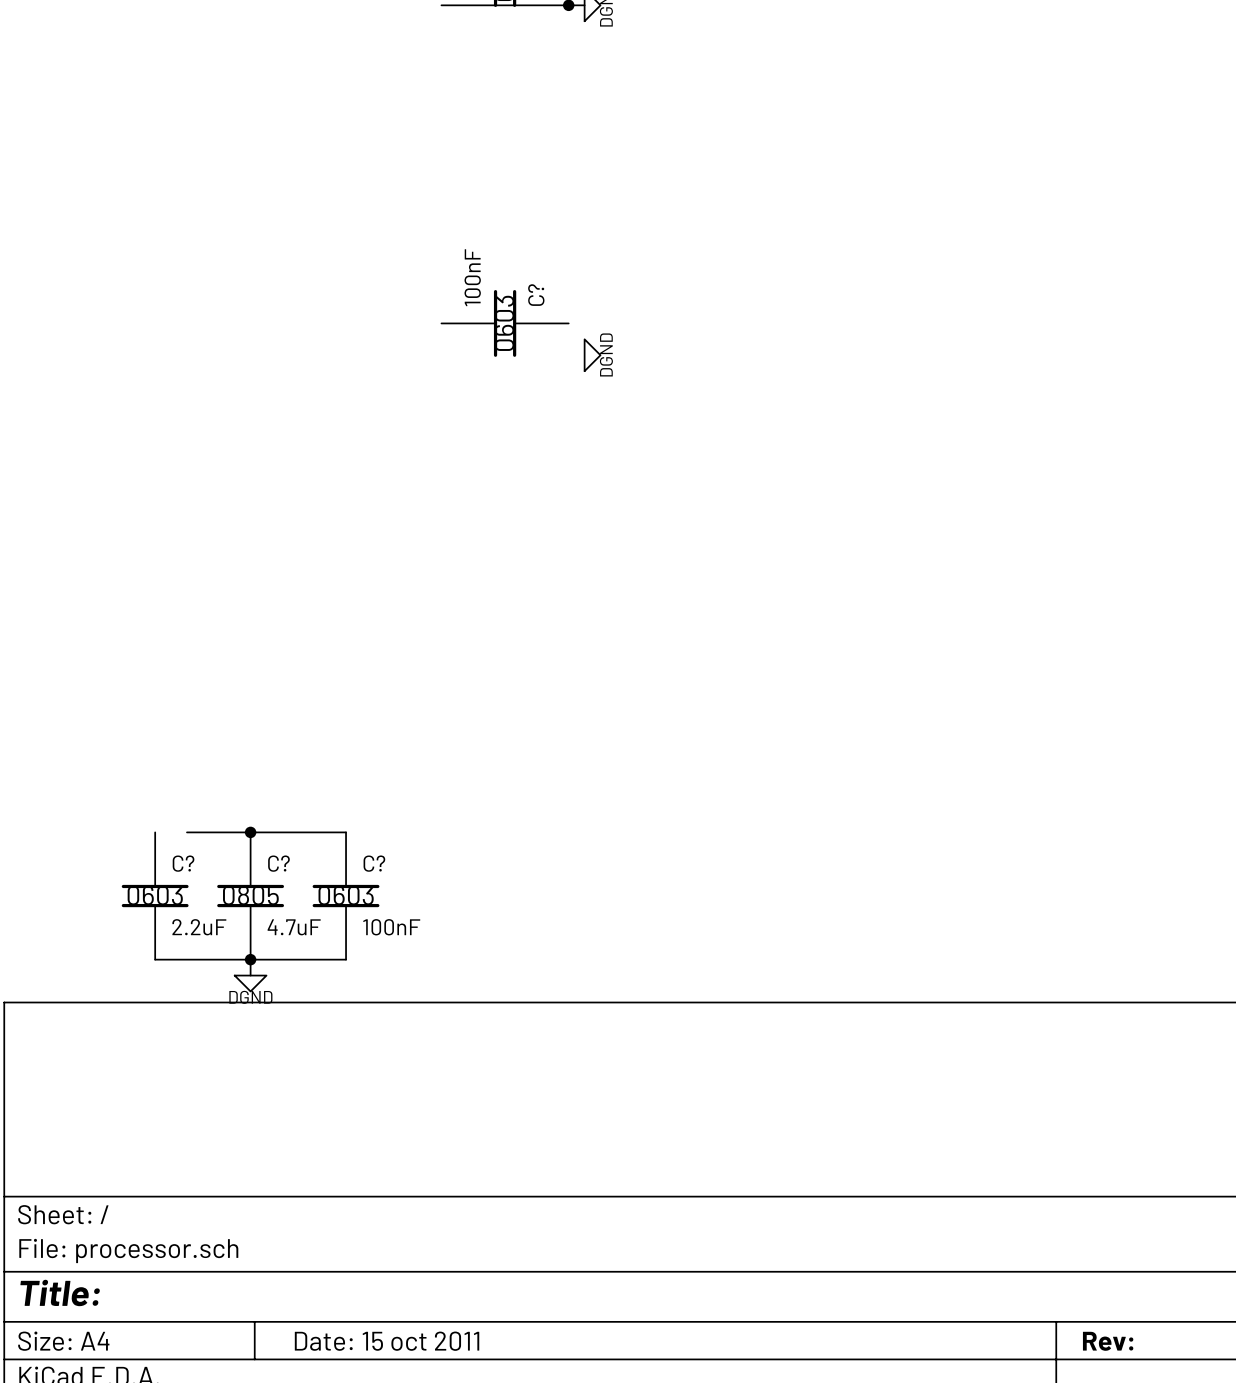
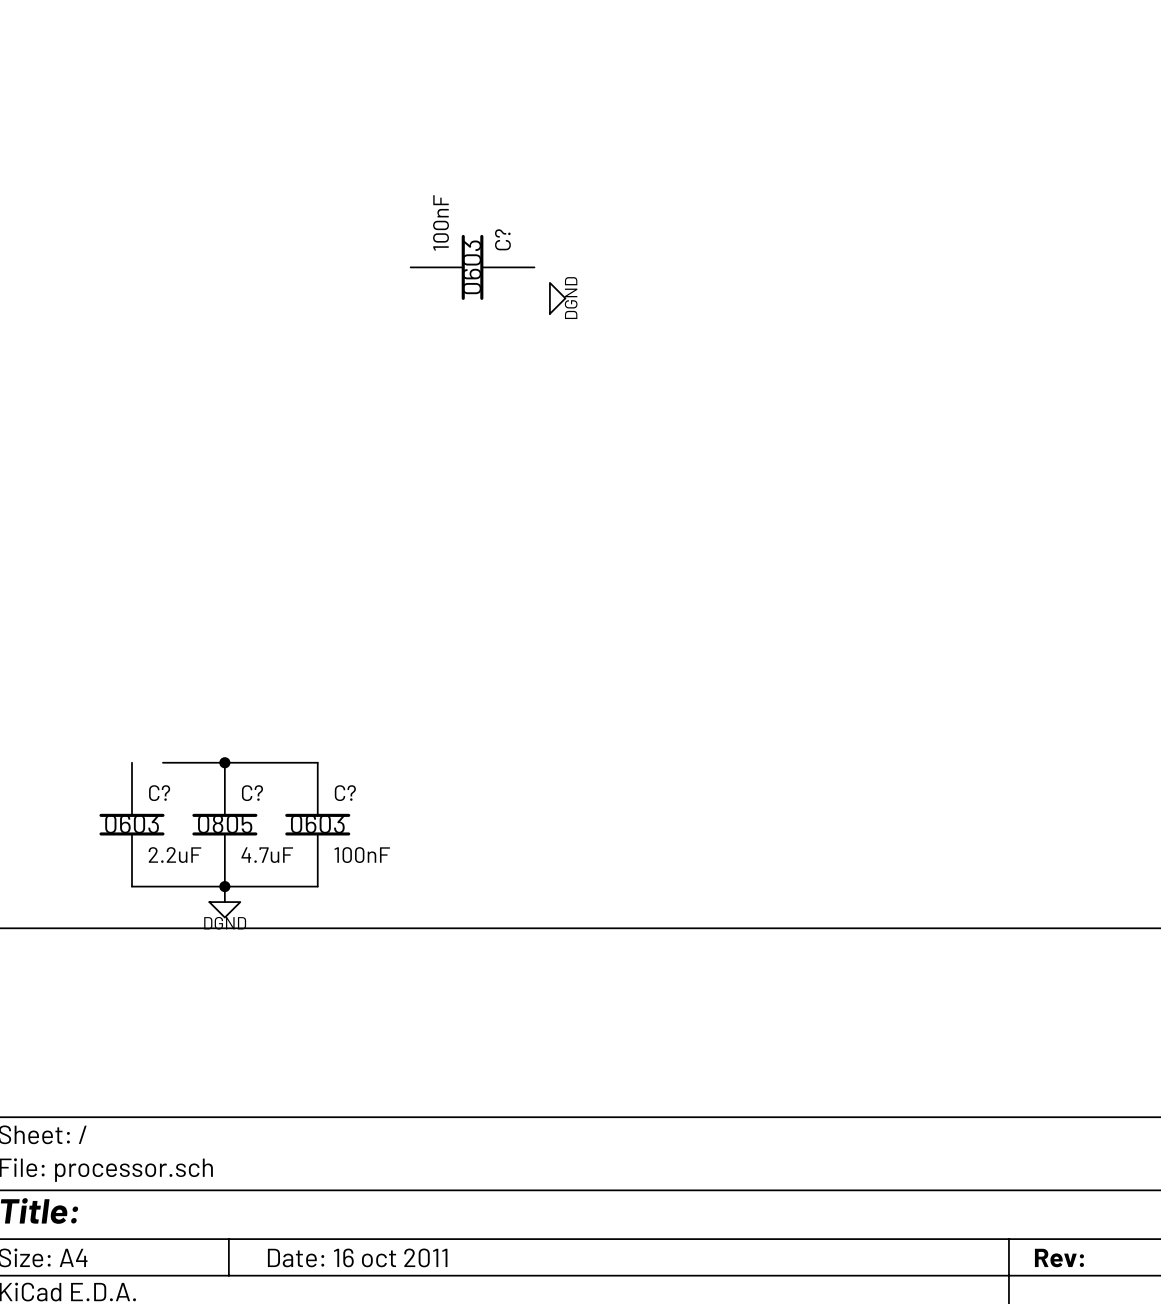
title block: Date: 15 oct 2011 (387, 1341) -> Date: 16 oct 2011 (357, 1257)

